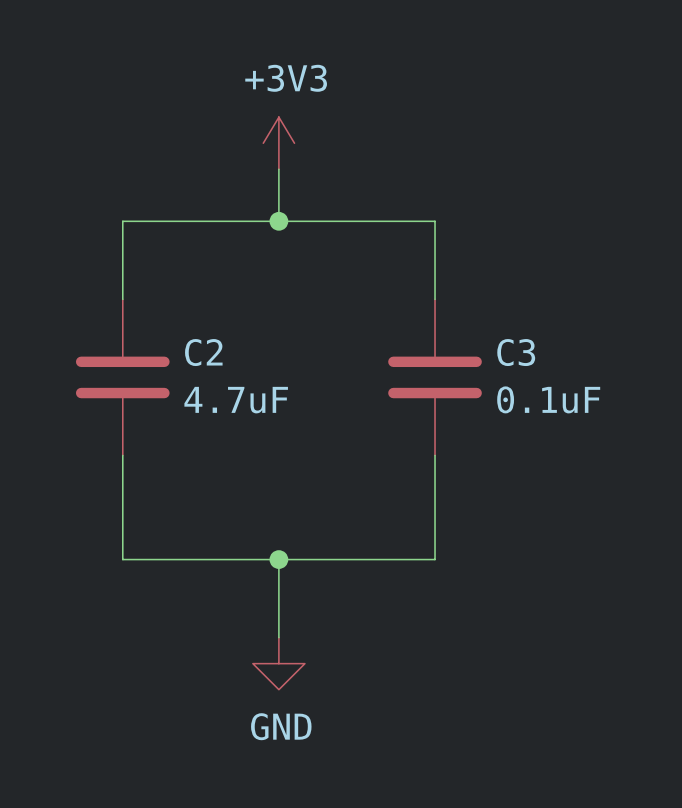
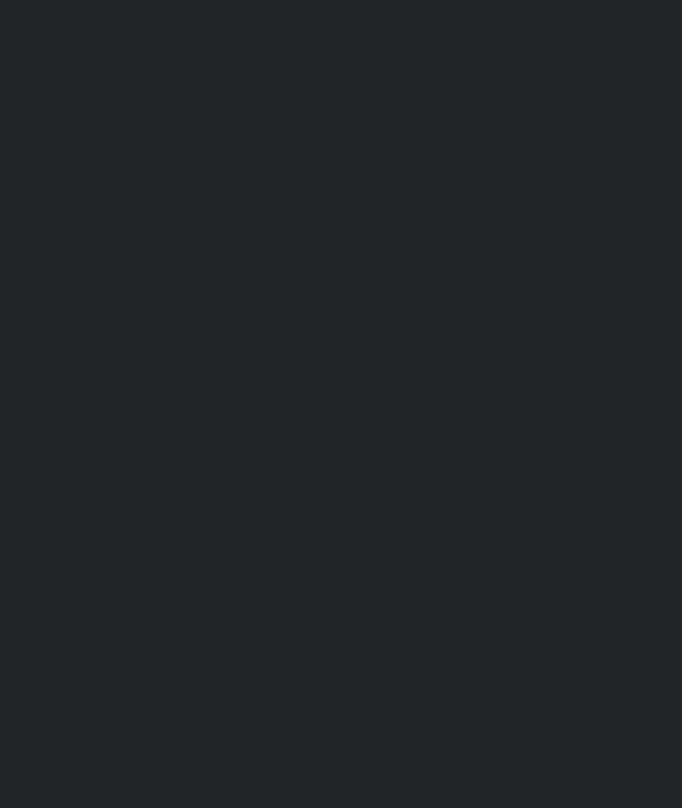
power symbol: +3V3 (278, 143) -> none
wire: (278, 169) (278, 221) -> none
junction: (278, 221) -> none
wire: (122, 299) (122, 221) (435, 221) (435, 299) -> none
C2: 4.7uF (122, 377) -> none
C3: 0.1uF (435, 377) -> none
wire: (122, 455) (122, 559) (435, 559) (435, 455) -> none
wire: (278, 559) (278, 637) -> none
junction: (278, 559) -> none
power symbol: GND (278, 663) -> none

